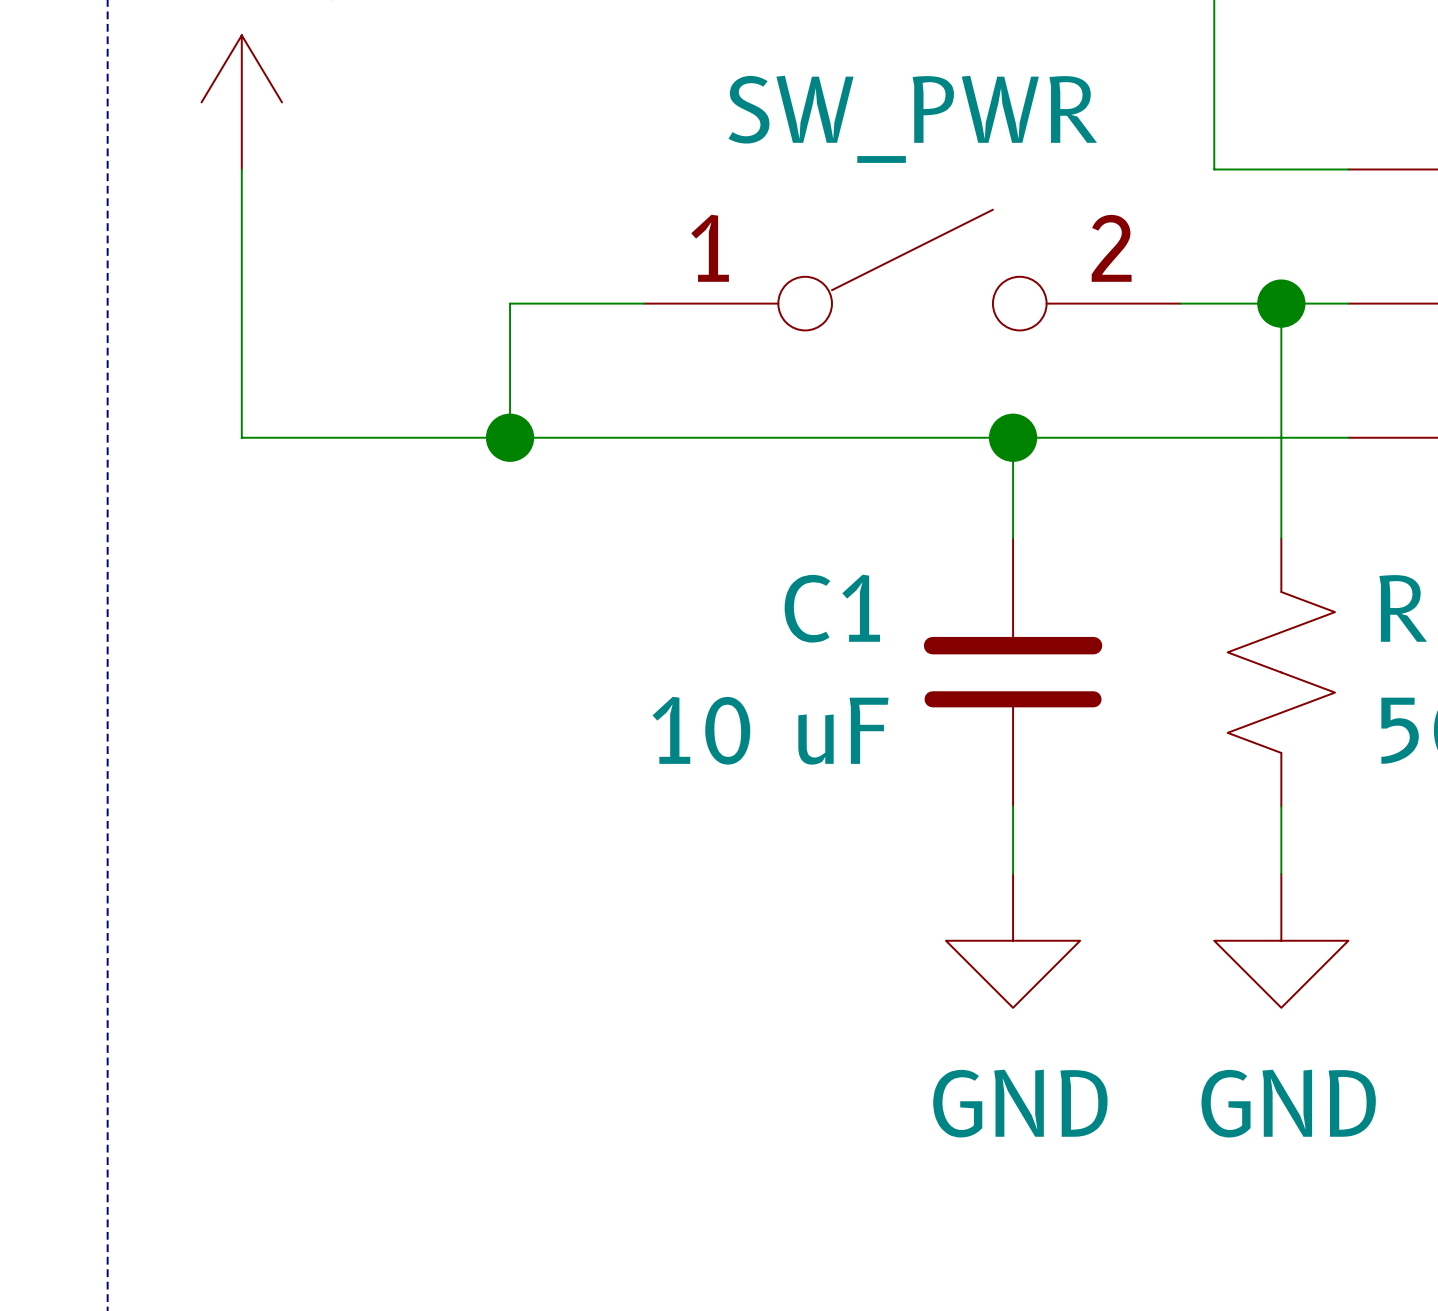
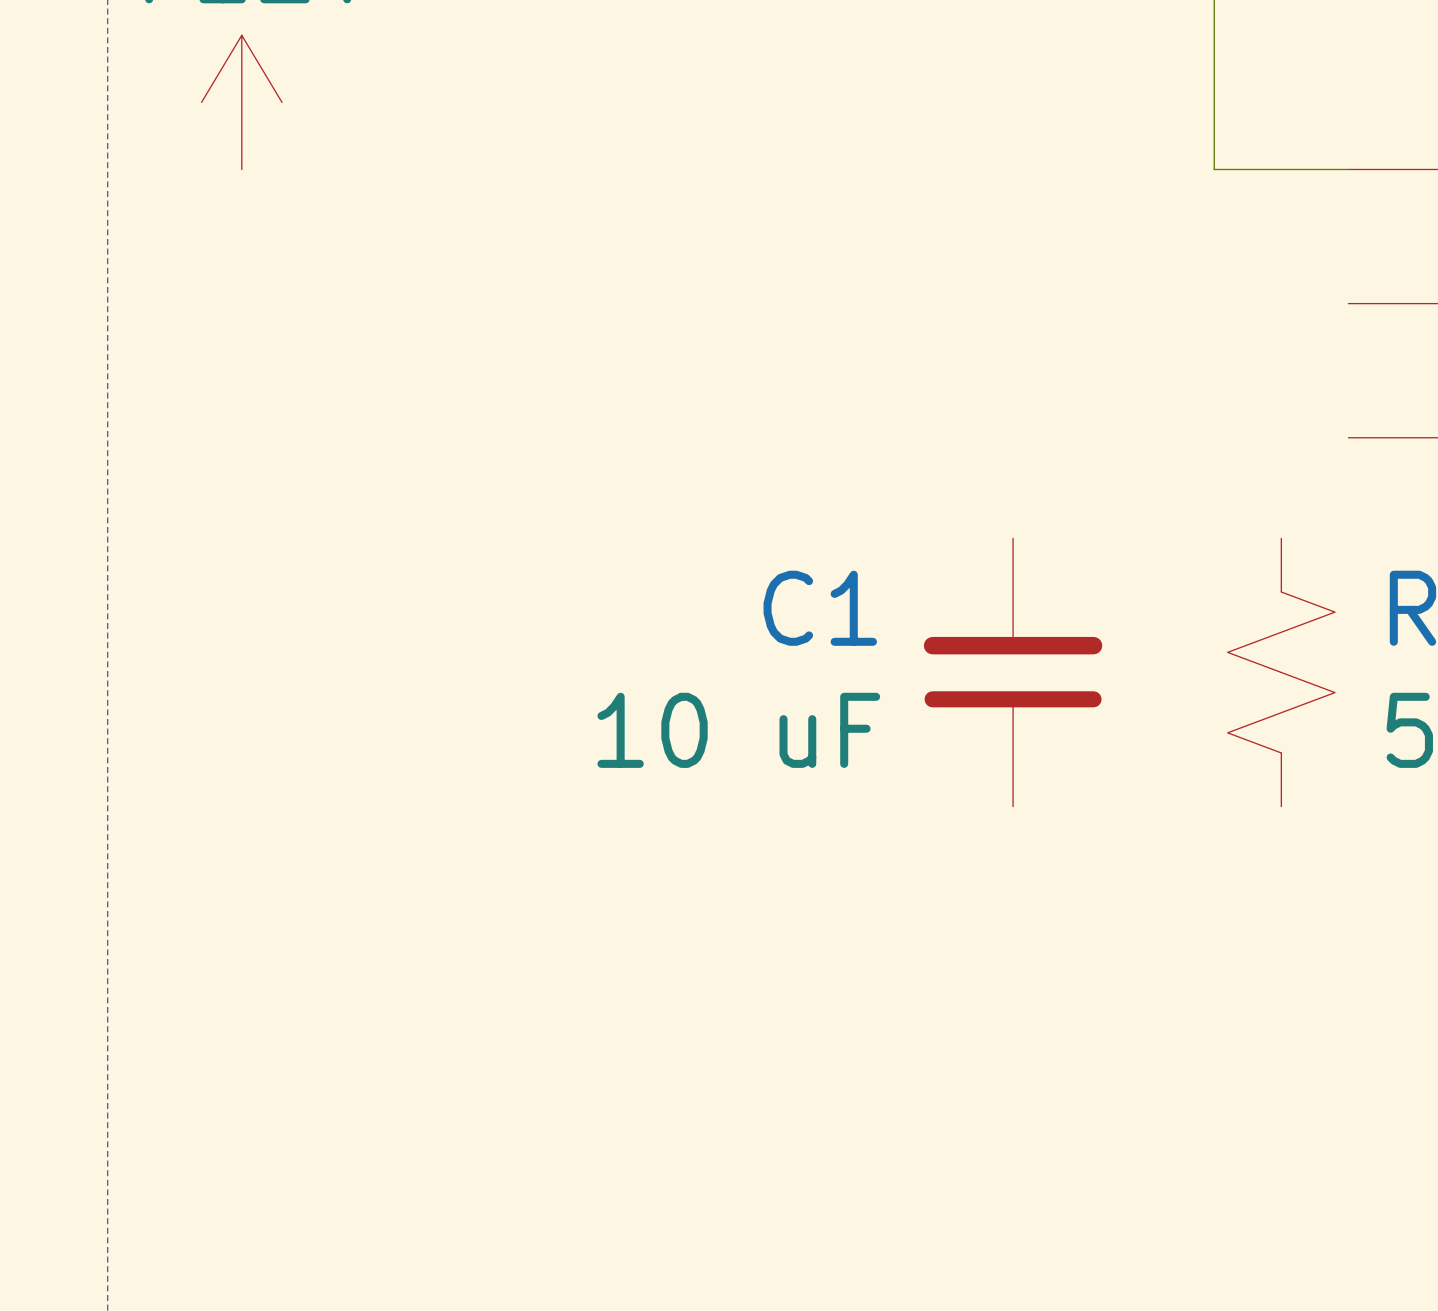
wire: (241, 169) (241, 437) (1348, 437) -> none
SW_PWR: (912, 270) -> none
wire: (644, 303) (510, 303) (510, 437) -> none
wire: (1180, 303) (1348, 303) -> none
wire: (1281, 303) (1281, 538) -> none
junction: (1281, 303) -> none
junction: (510, 437) -> none
wire: (1013, 437) (1013, 538) -> none
junction: (1013, 437) -> none
wire: (1013, 806) (1013, 873) -> none
wire: (1281, 806) (1281, 873) -> none
power symbol: GND (1013, 940) -> none
power symbol: GND (1281, 940) -> none

